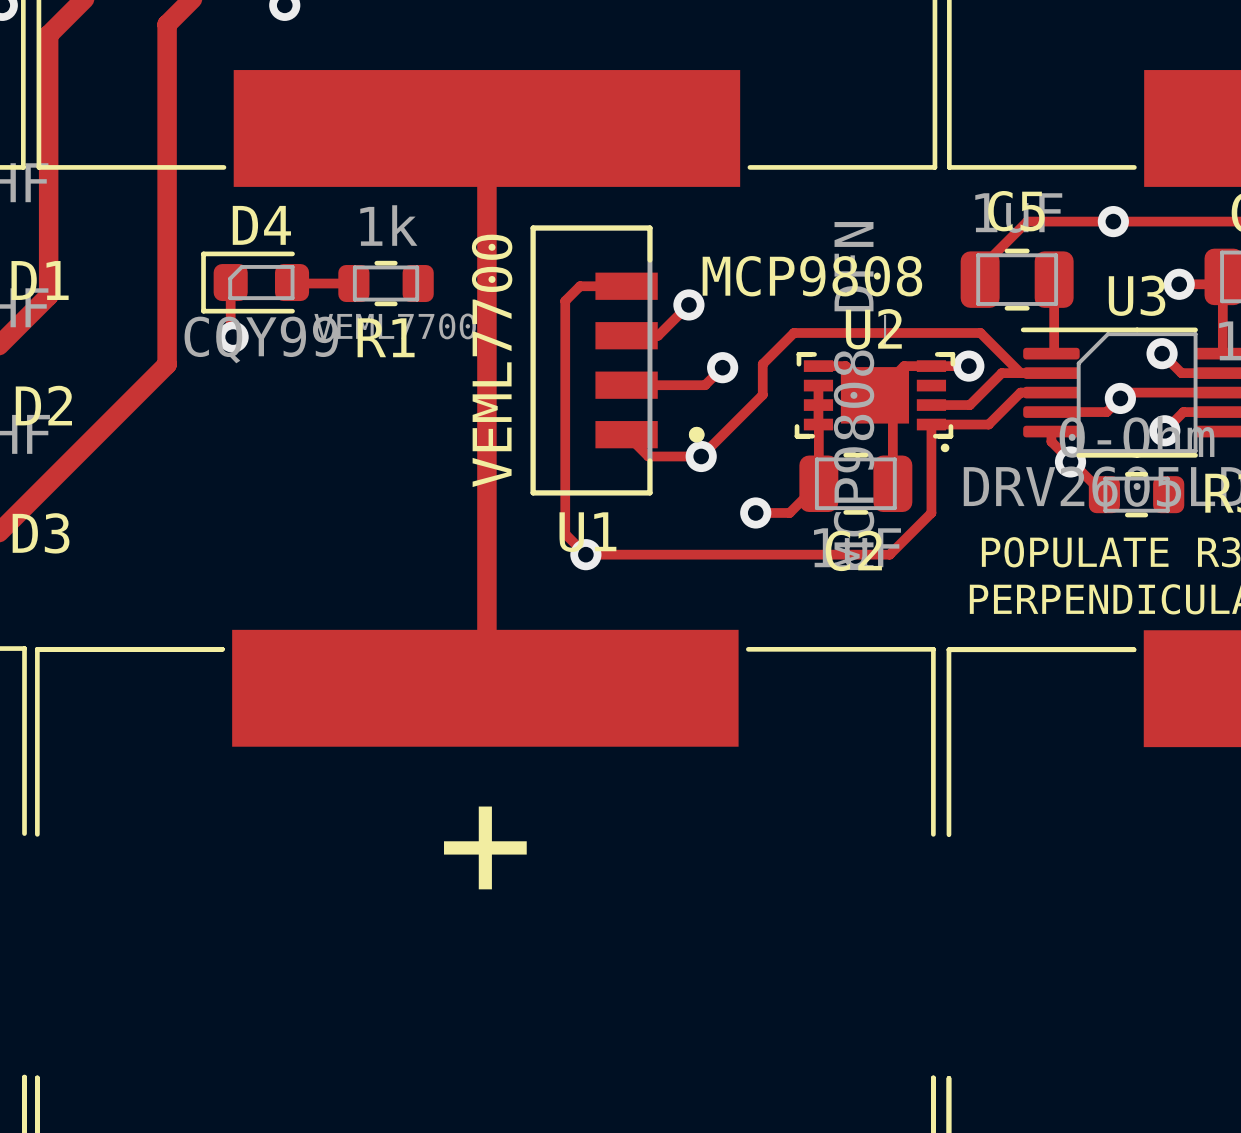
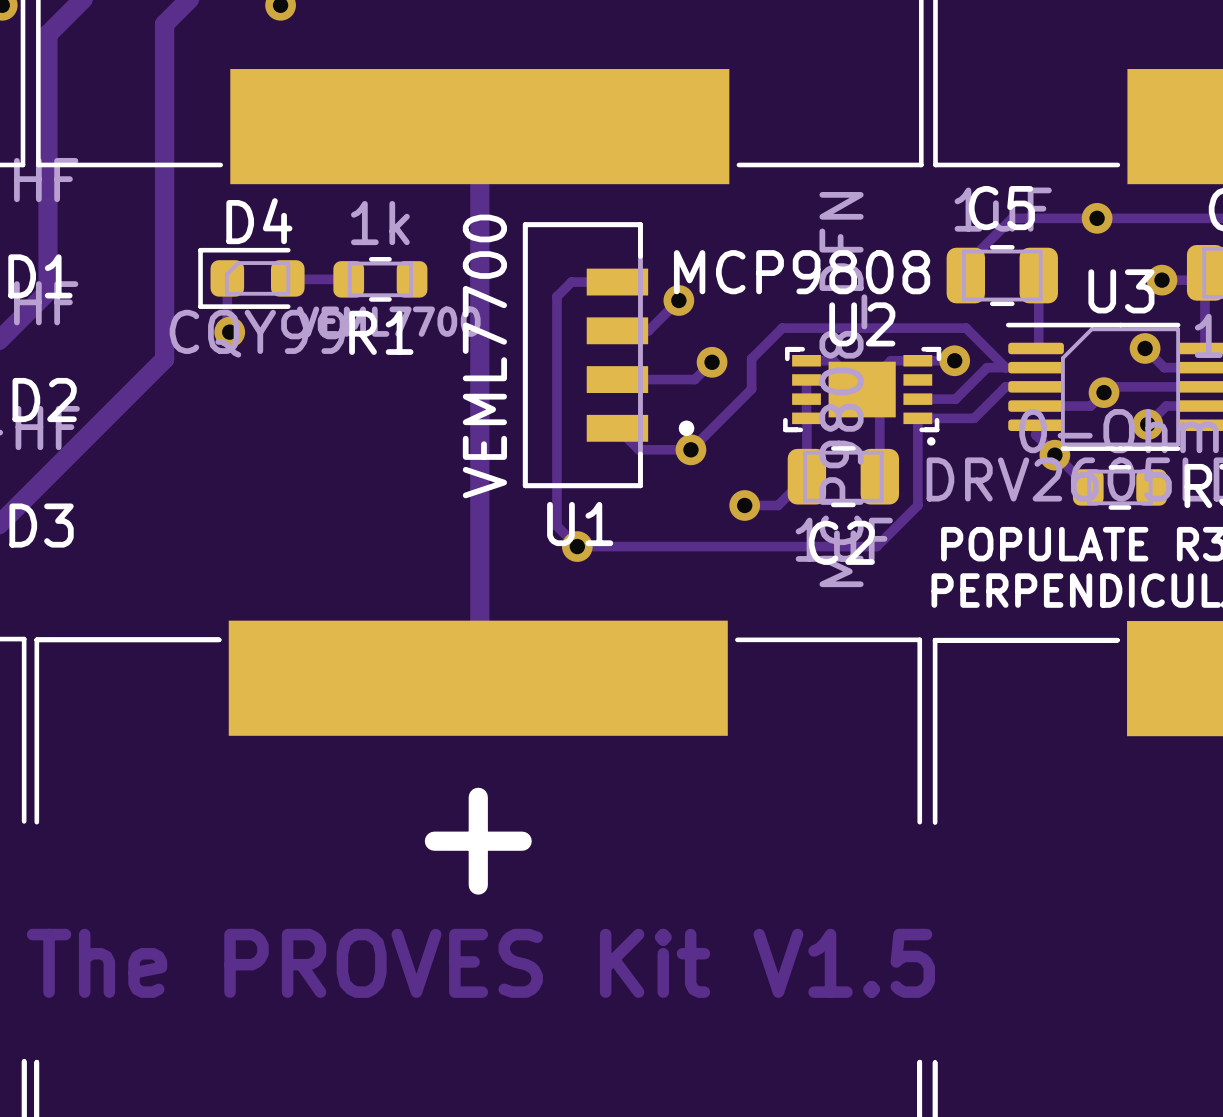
text: none -> The PROVES Kit V1.5 (480, 963)

